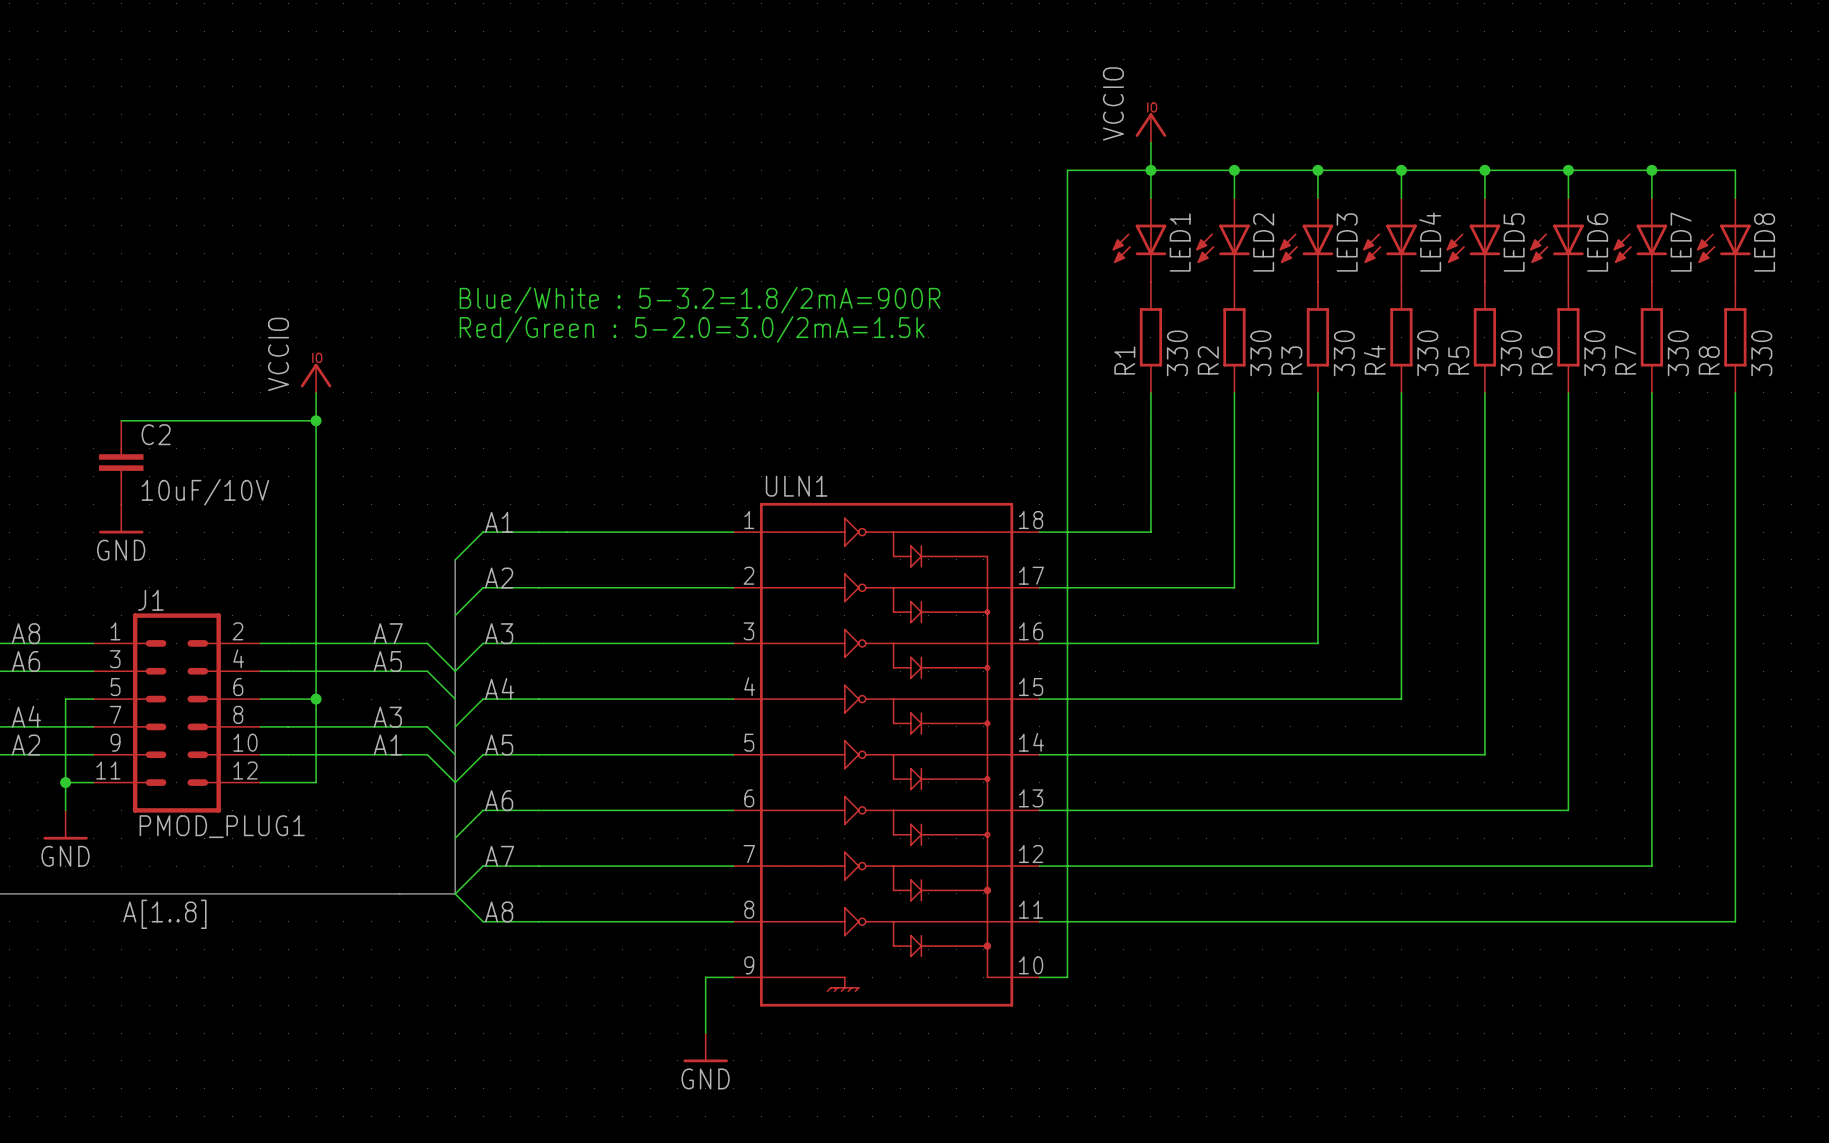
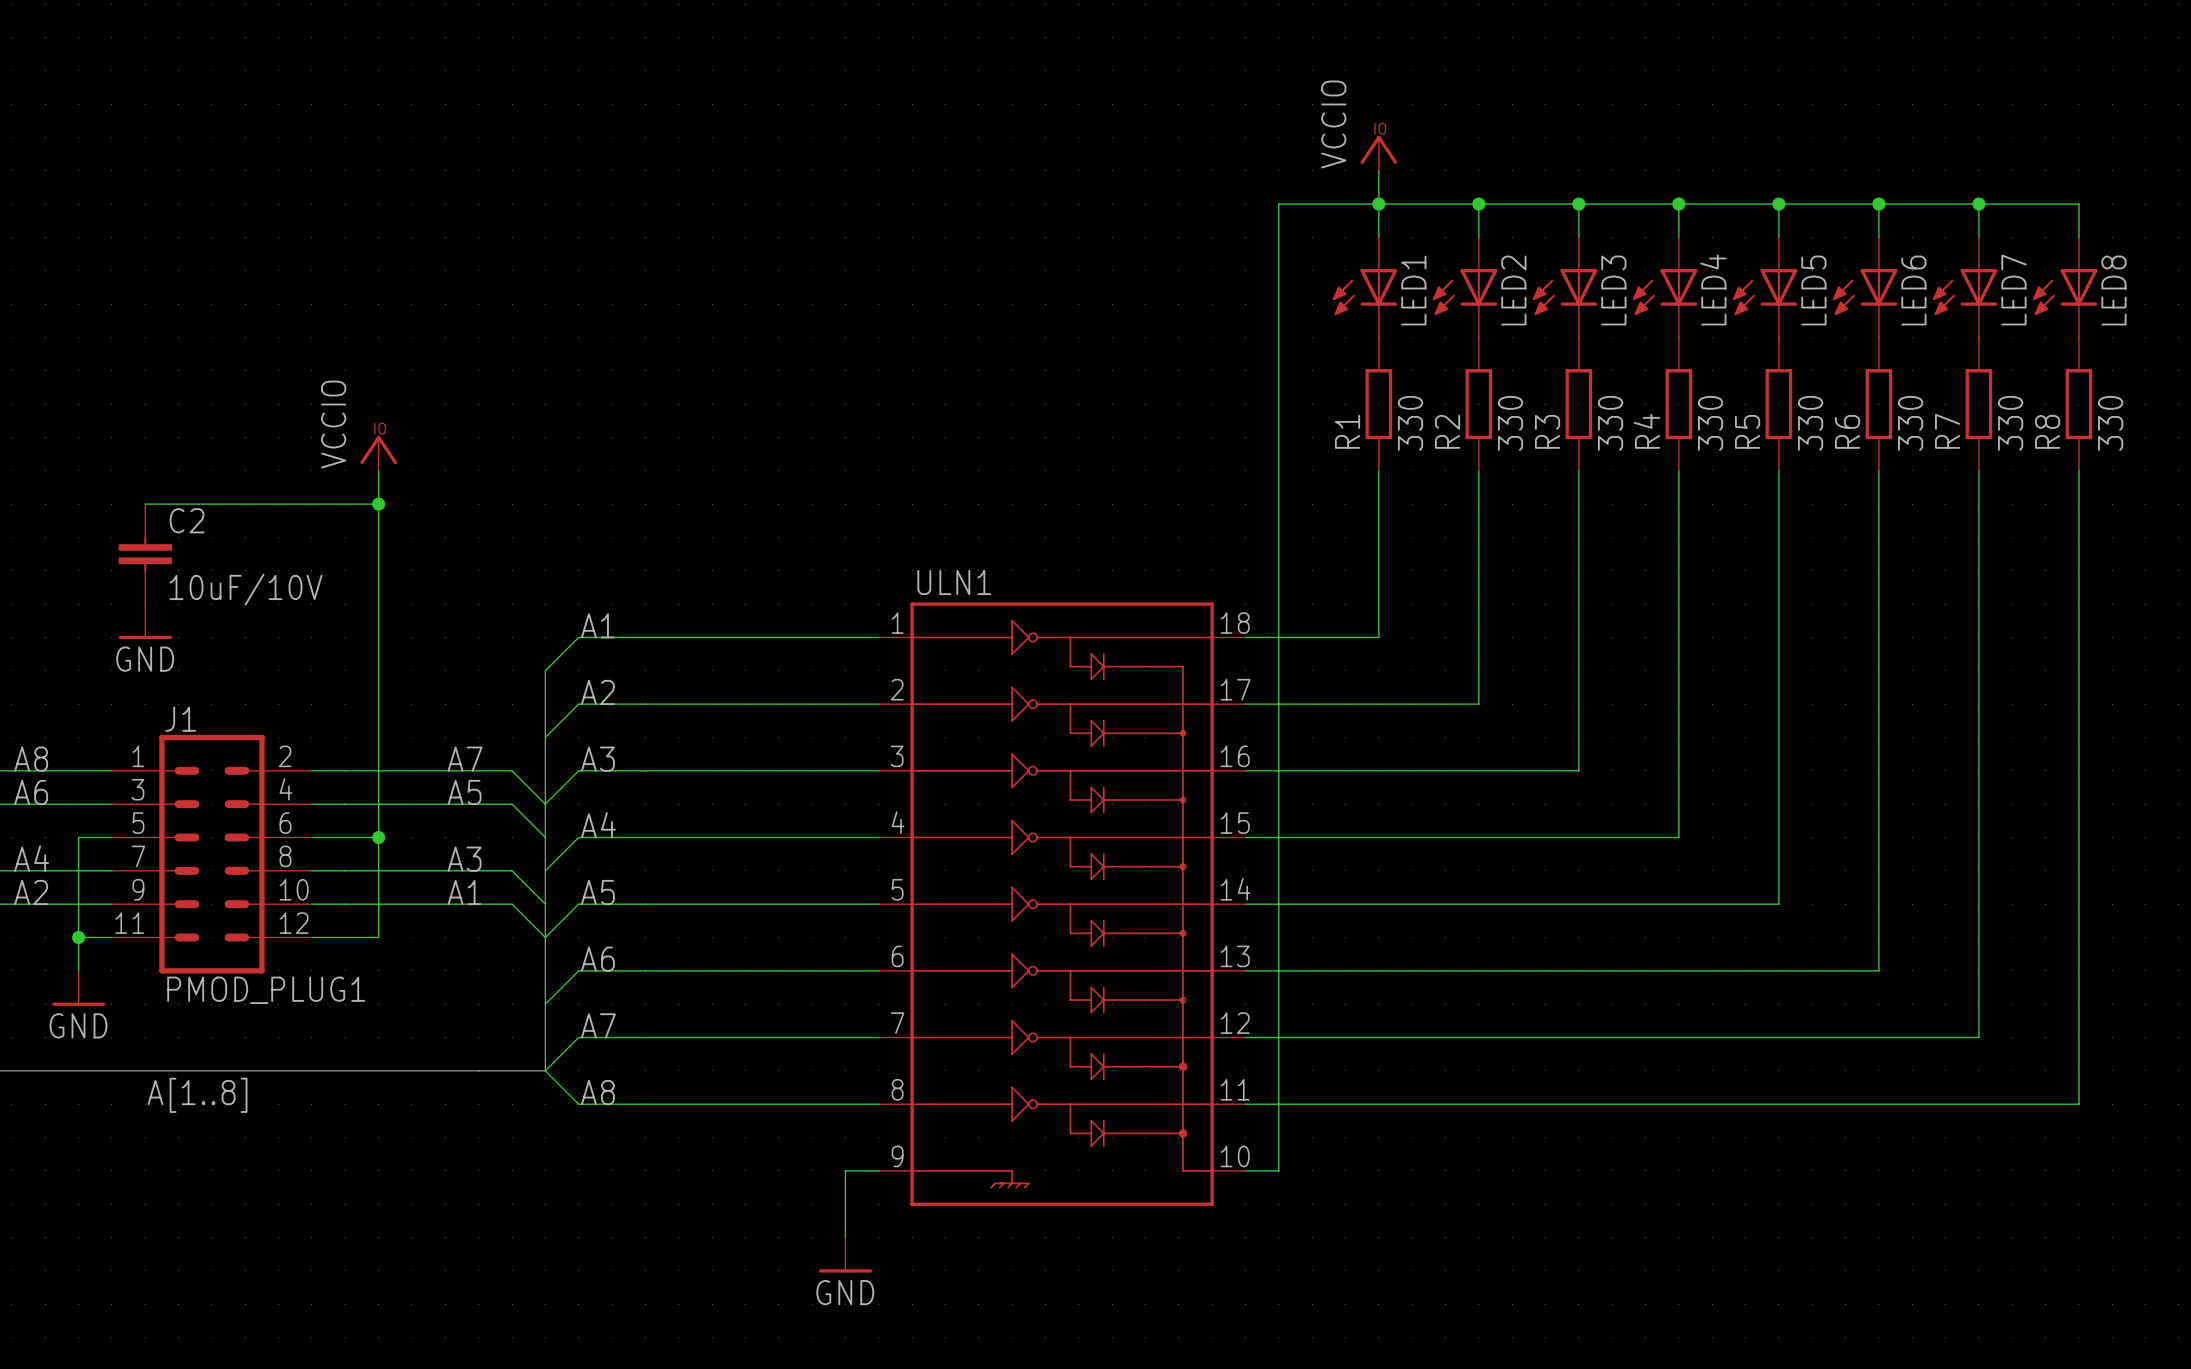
text: Blue/White : 5-3.2=1.8/2mA=900R (700, 300) -> none
text: Red/Green : 5-2.0=3.0/2mA=1.5k (692, 329) -> none

